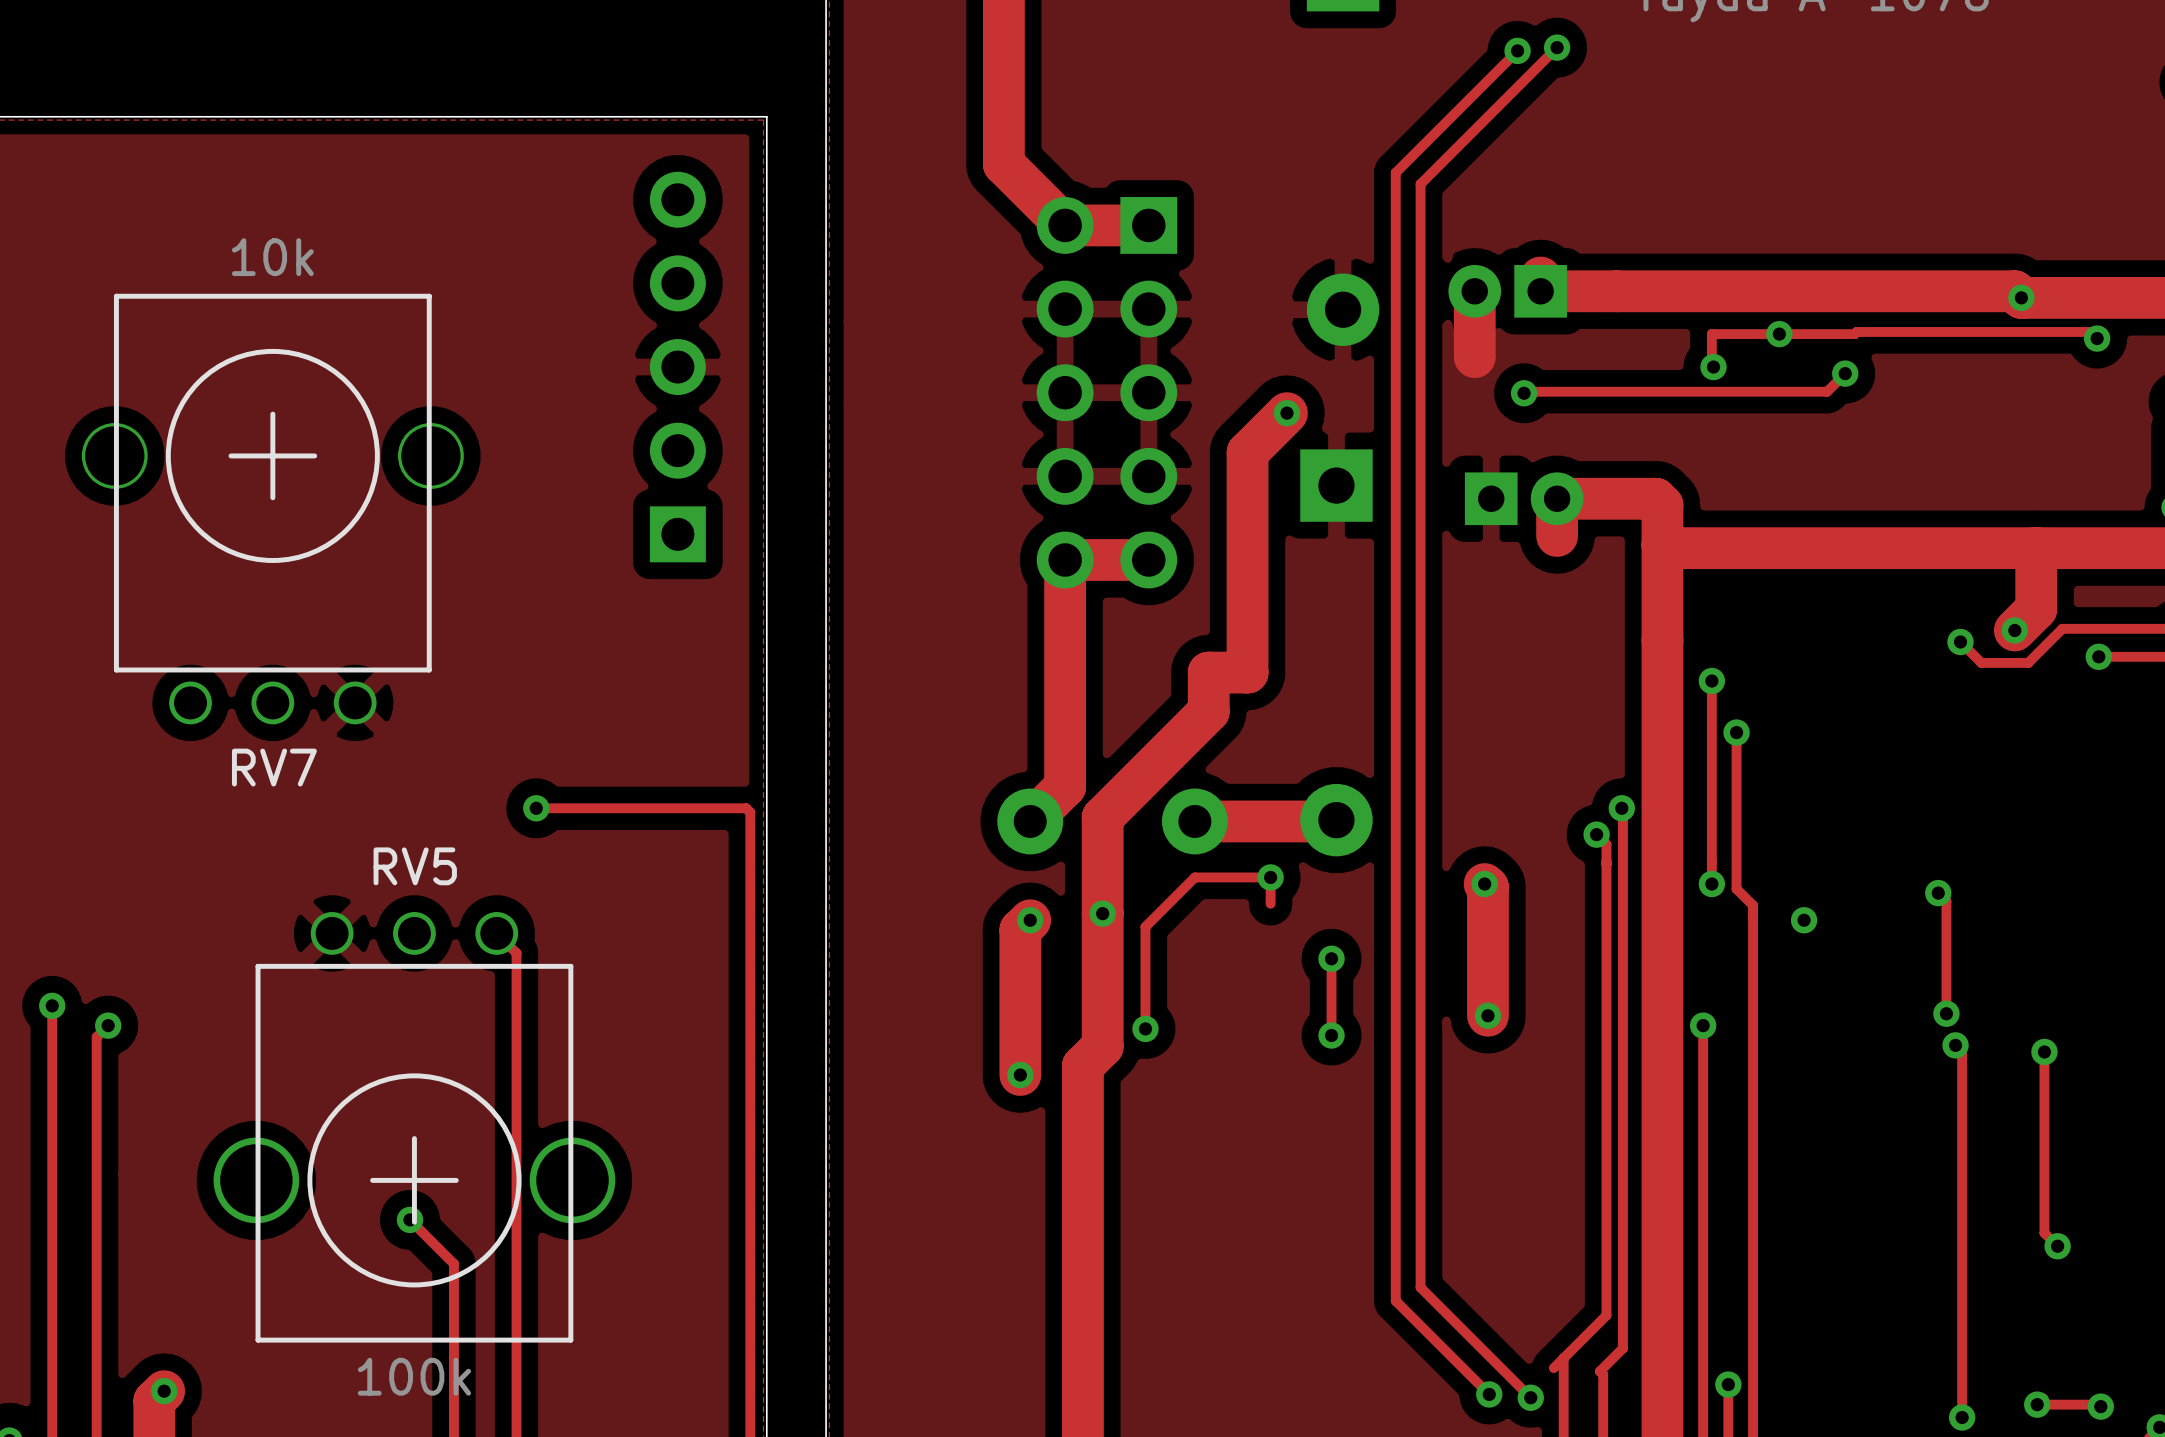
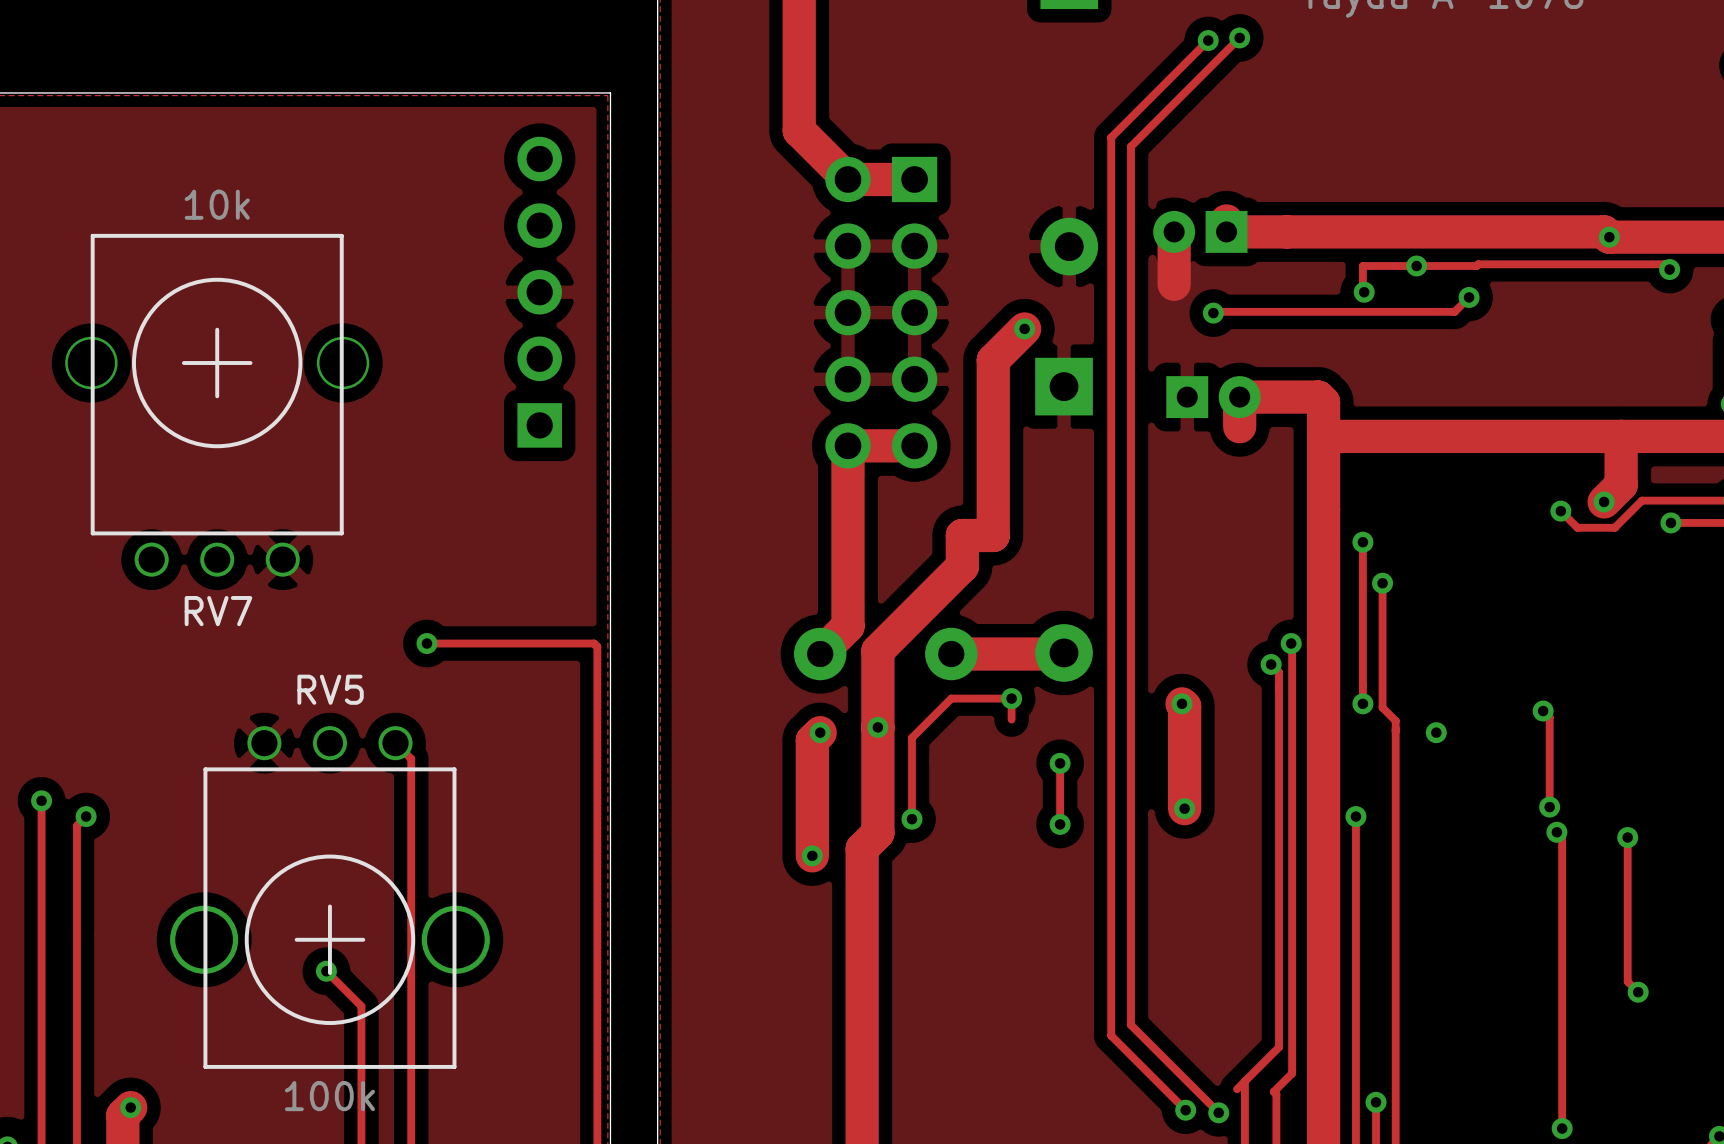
track: (2043, 1398) (2037, 1404) (2098, 1404) (2100, 1406) -> none
via: (2037, 1404) -> none
via: (2100, 1406) -> none

